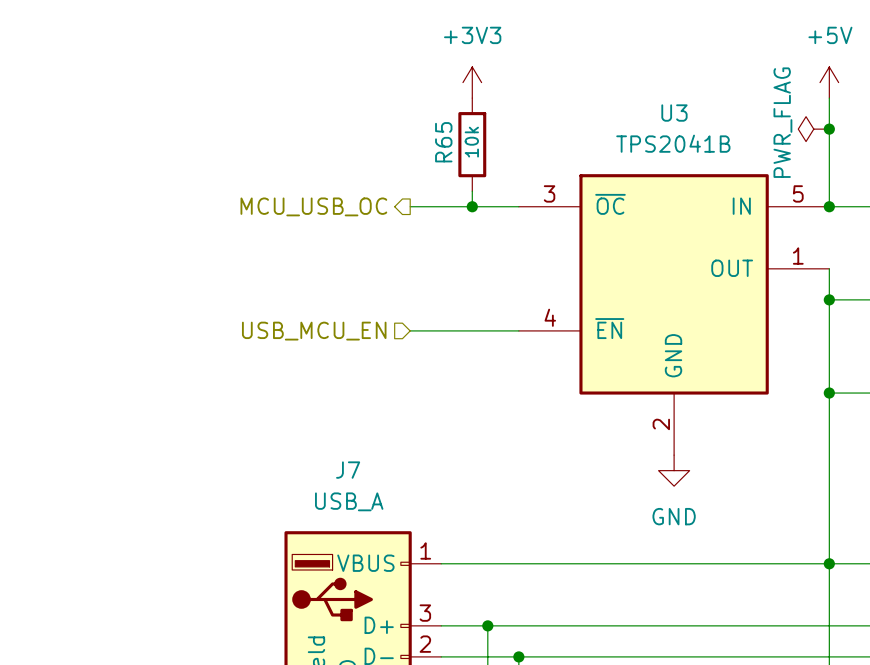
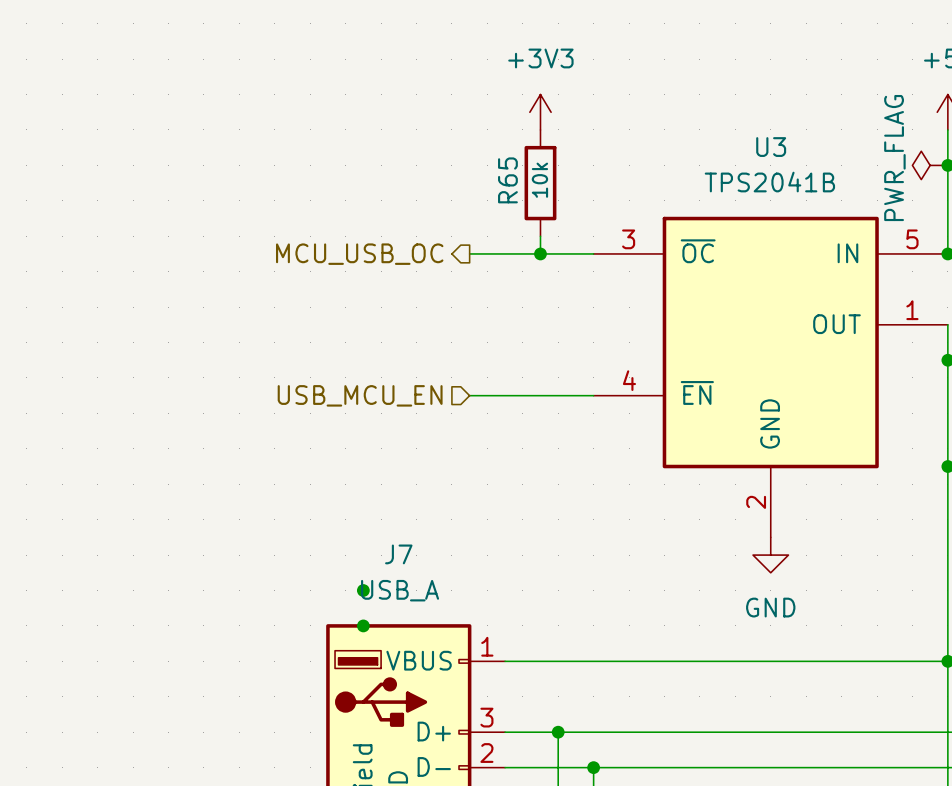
junction: none -> (363, 590)
junction: none -> (363, 625)

